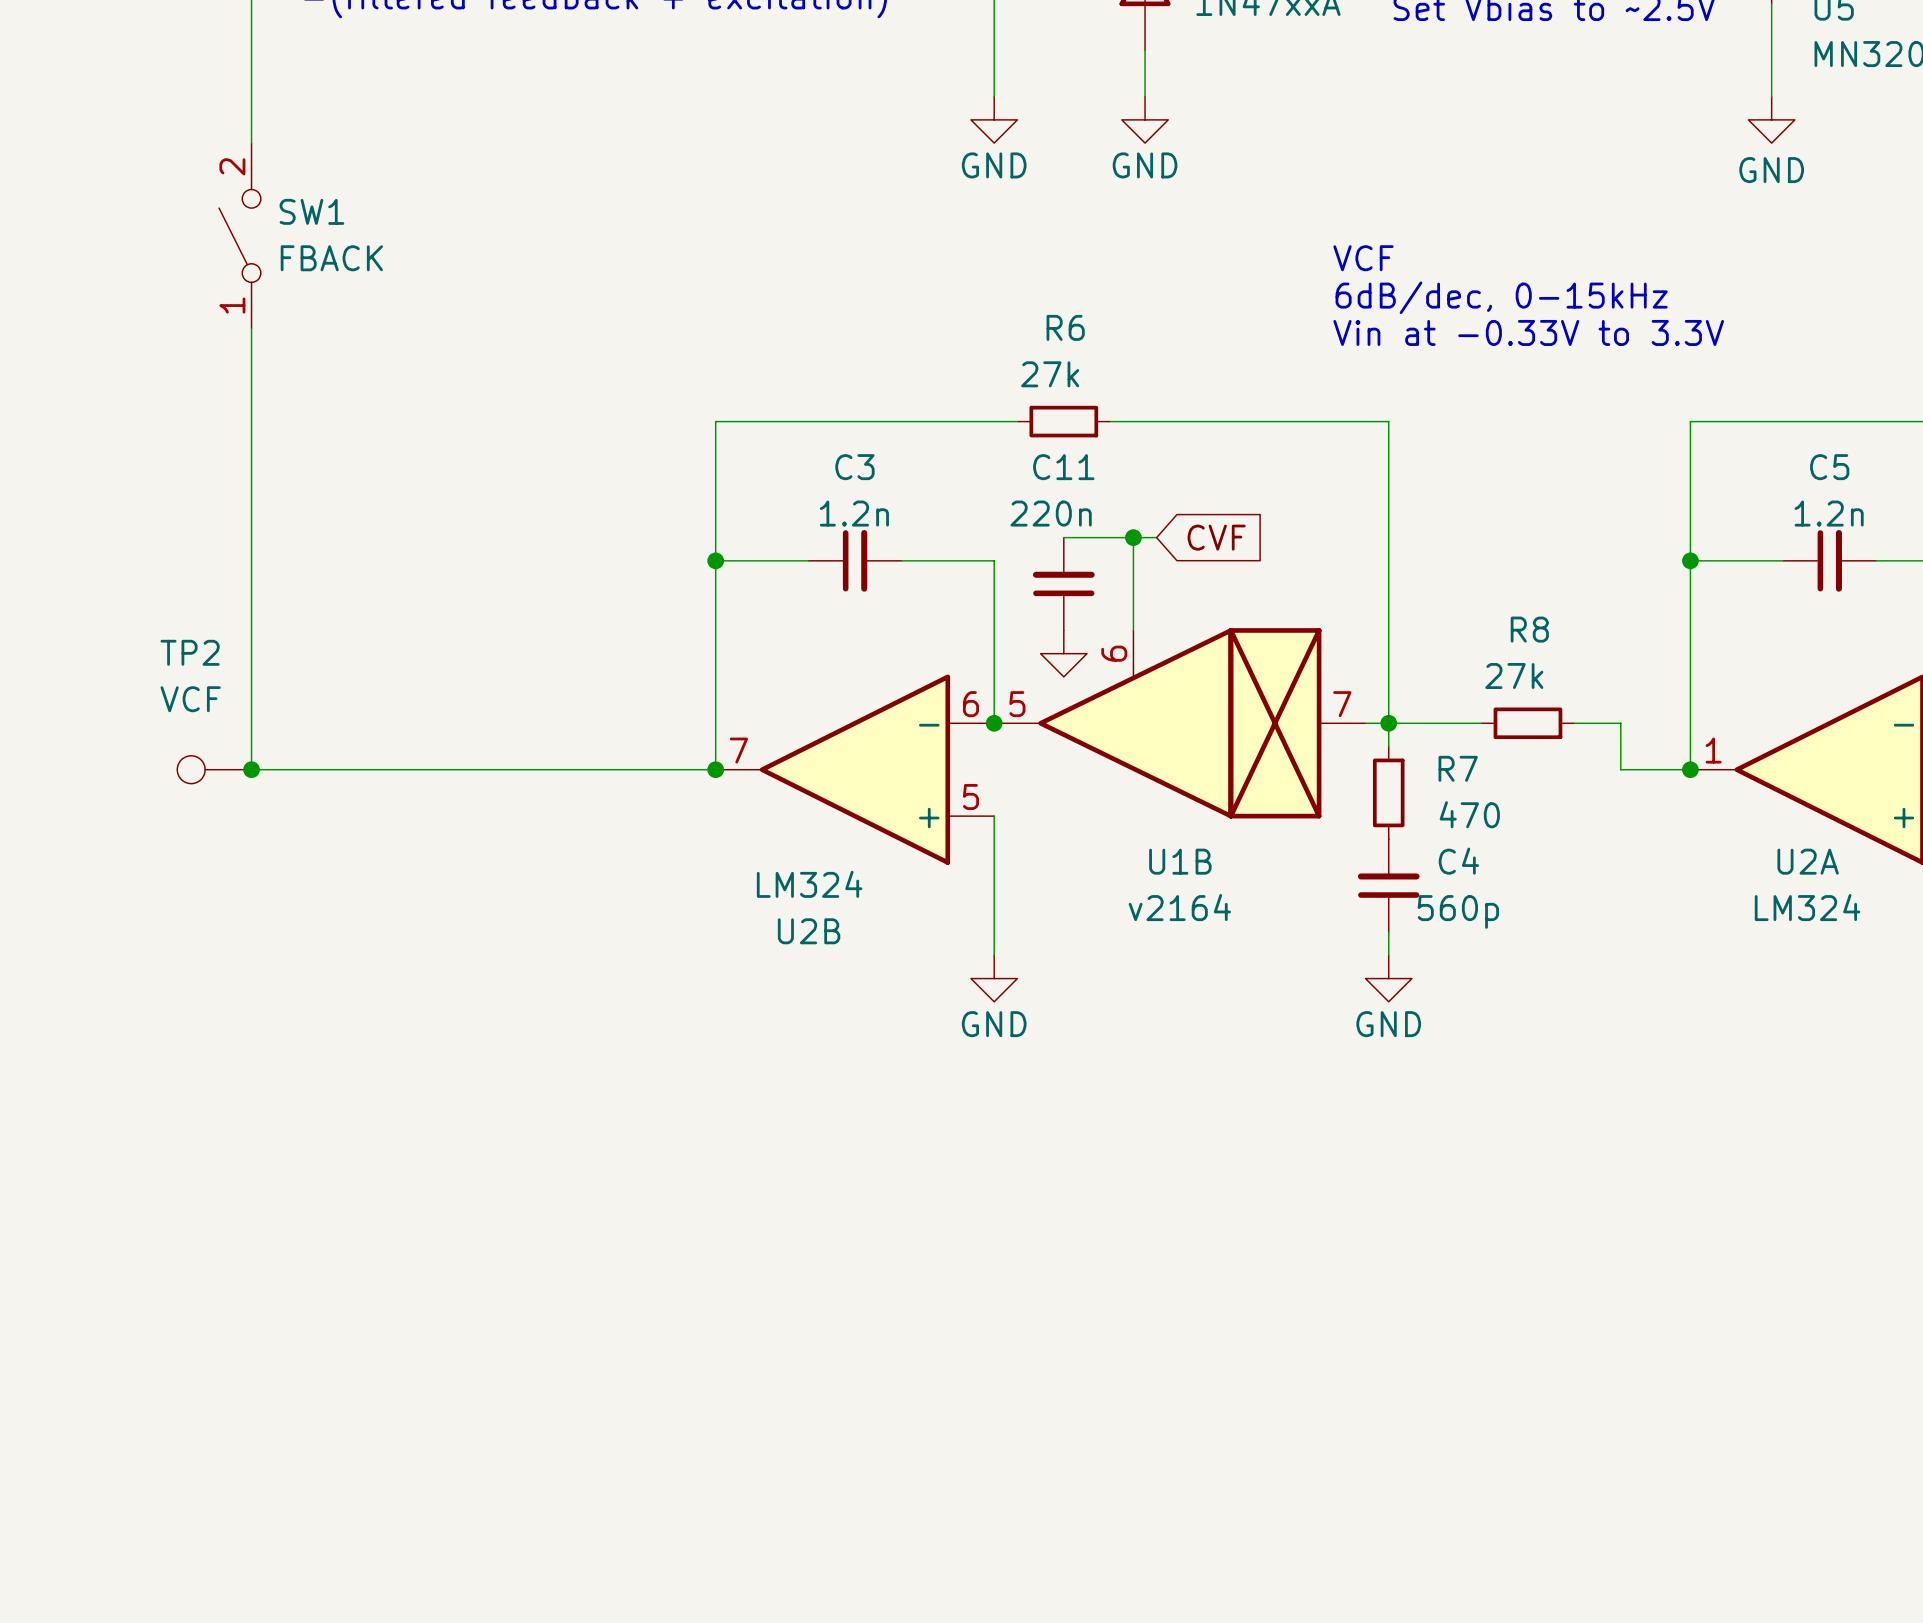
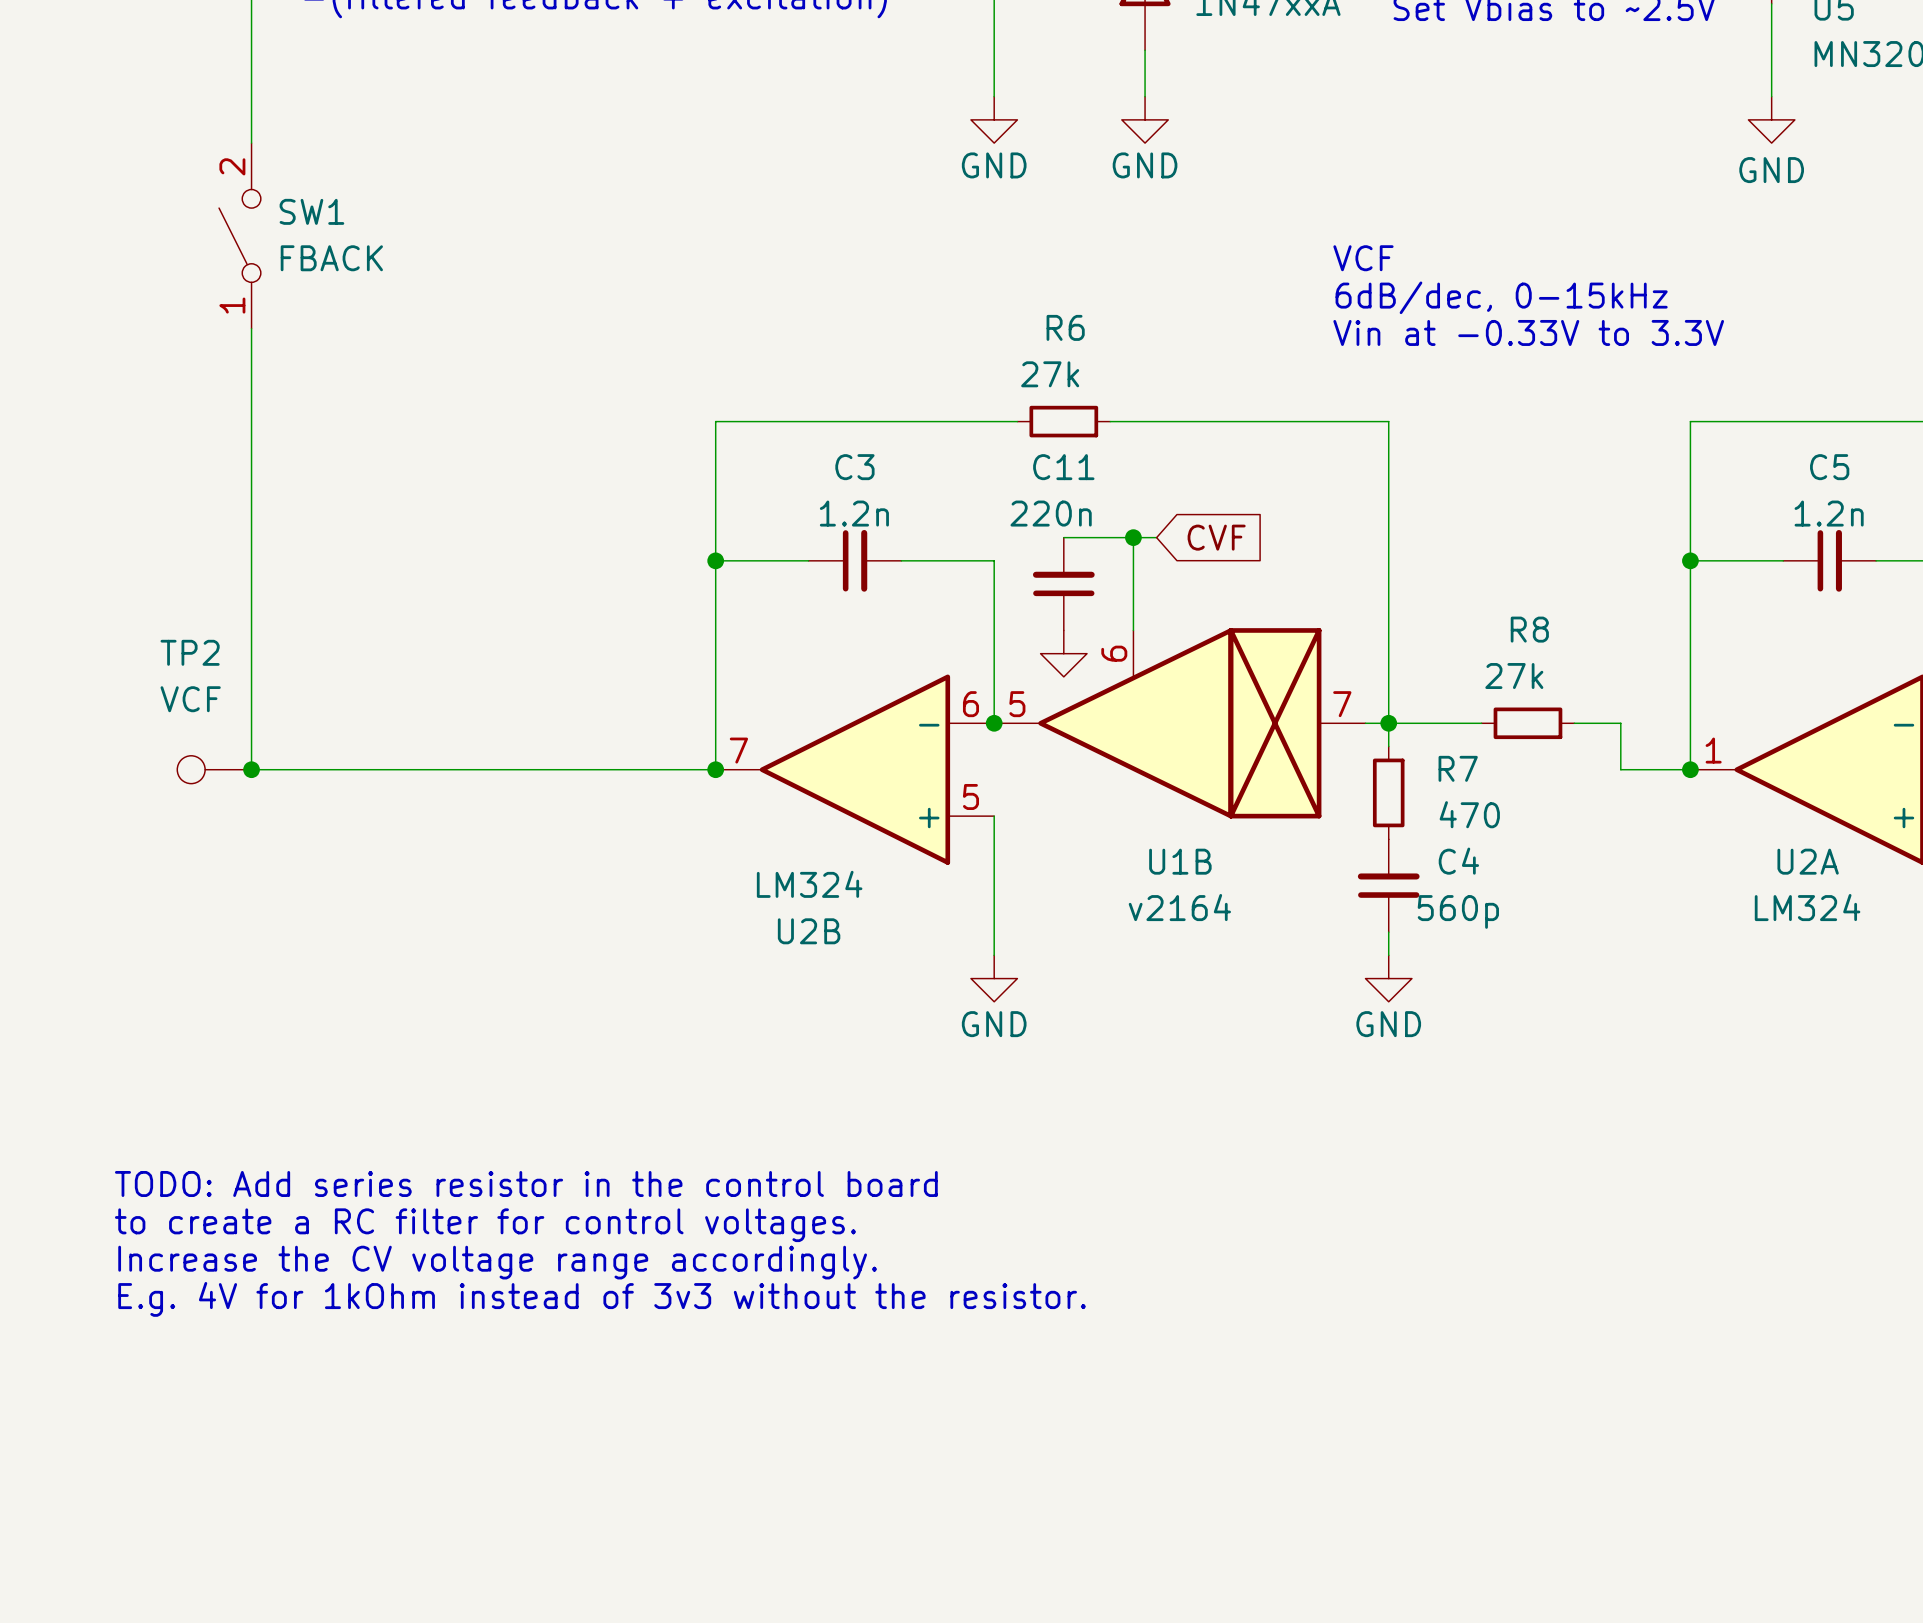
text: none -> TODO: Add series resistor in the control board (526, 1183)
text: none -> to create a RC filter for control voltages. (485, 1225)
text: none -> Increase the CV voltage range accordingly. (497, 1262)
text: none -> E.g. 4V for 1kOhm instead of 3v3 without the resistor. (602, 1299)

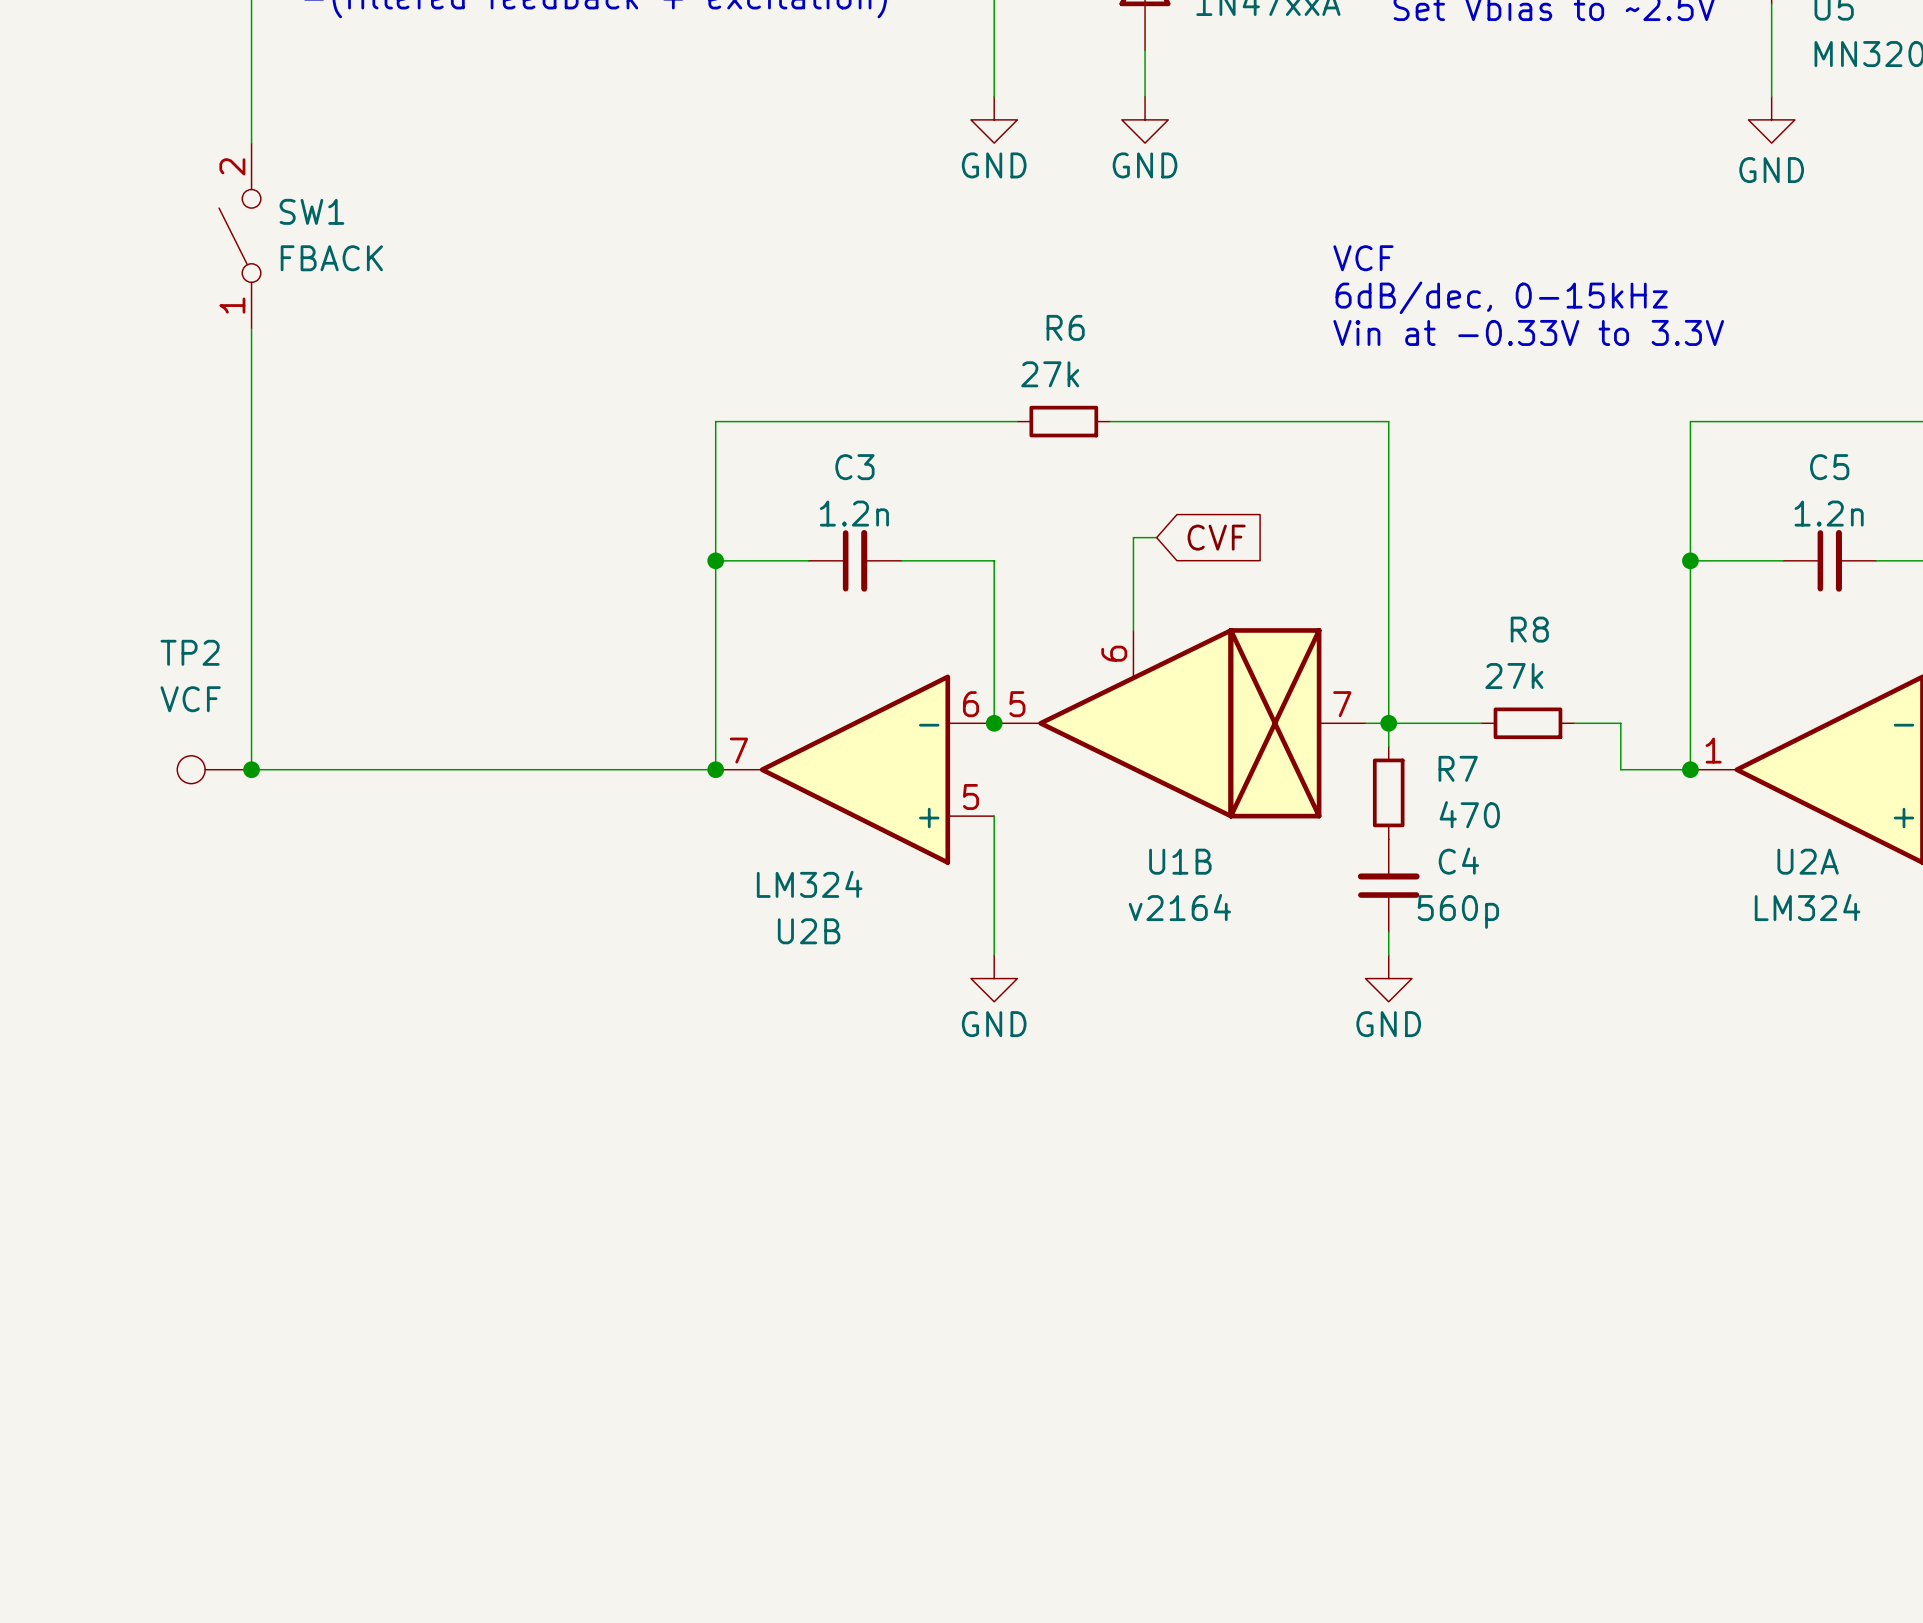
wire: (1063, 537) (1133, 537) -> none
junction: (1133, 537) -> none
C11: 220n (1063, 584) -> none
power symbol: (1063, 653) -> none
text: TODO: Add series resistor in the control board (526, 1183) -> none
text: to create a RC filter for control voltages. (485, 1225) -> none
text: Increase the CV voltage range accordingly. (497, 1262) -> none
text: E.g. 4V for 1kOhm instead of 3v3 without the resistor. (602, 1299) -> none

